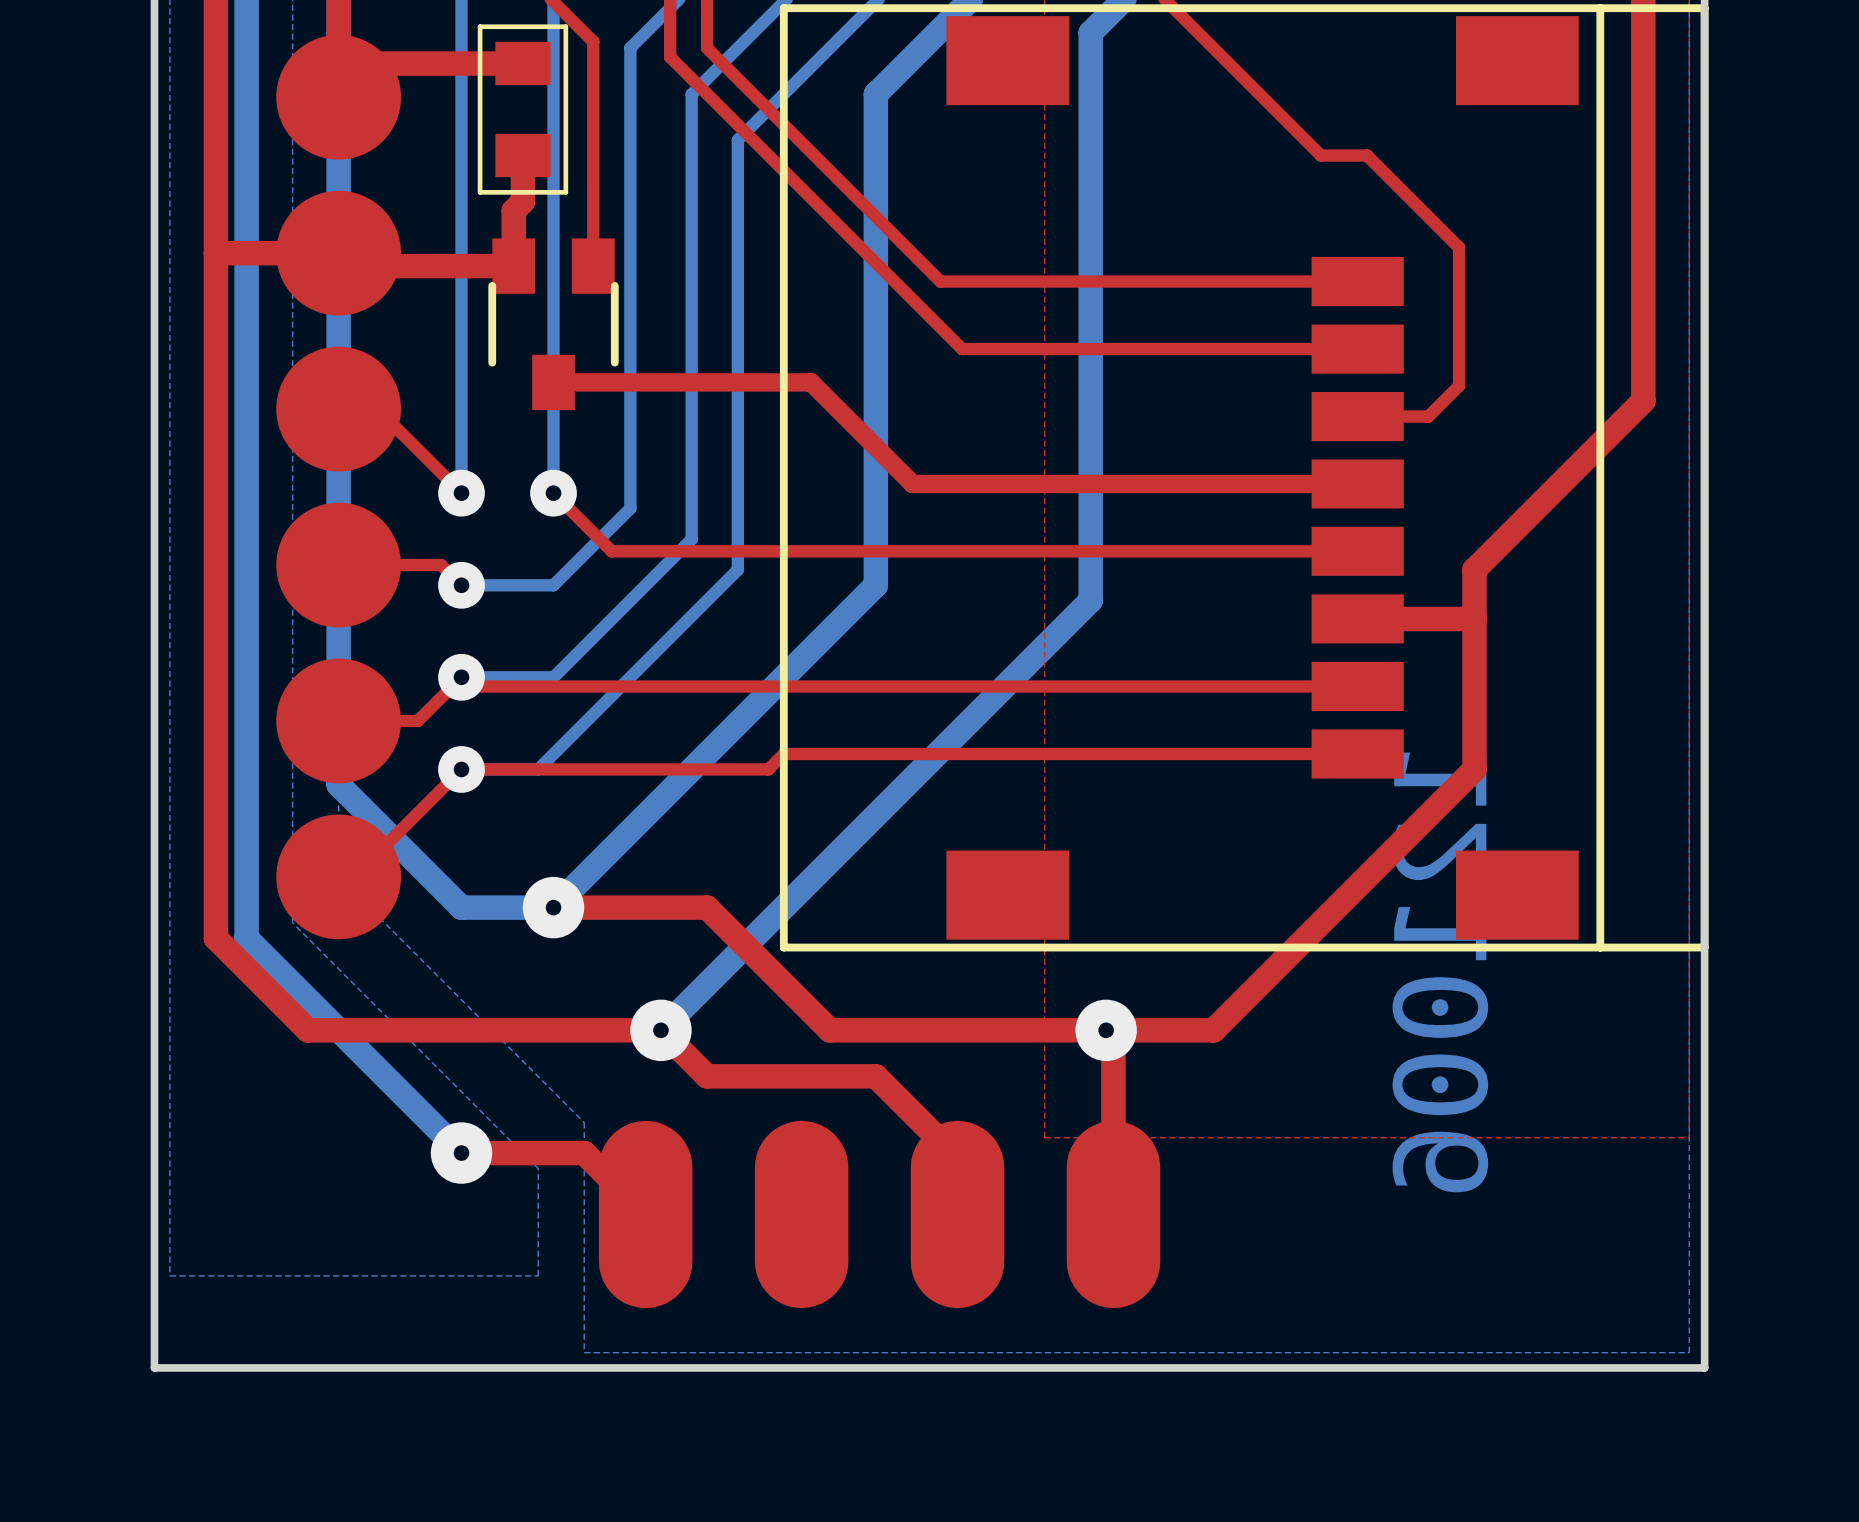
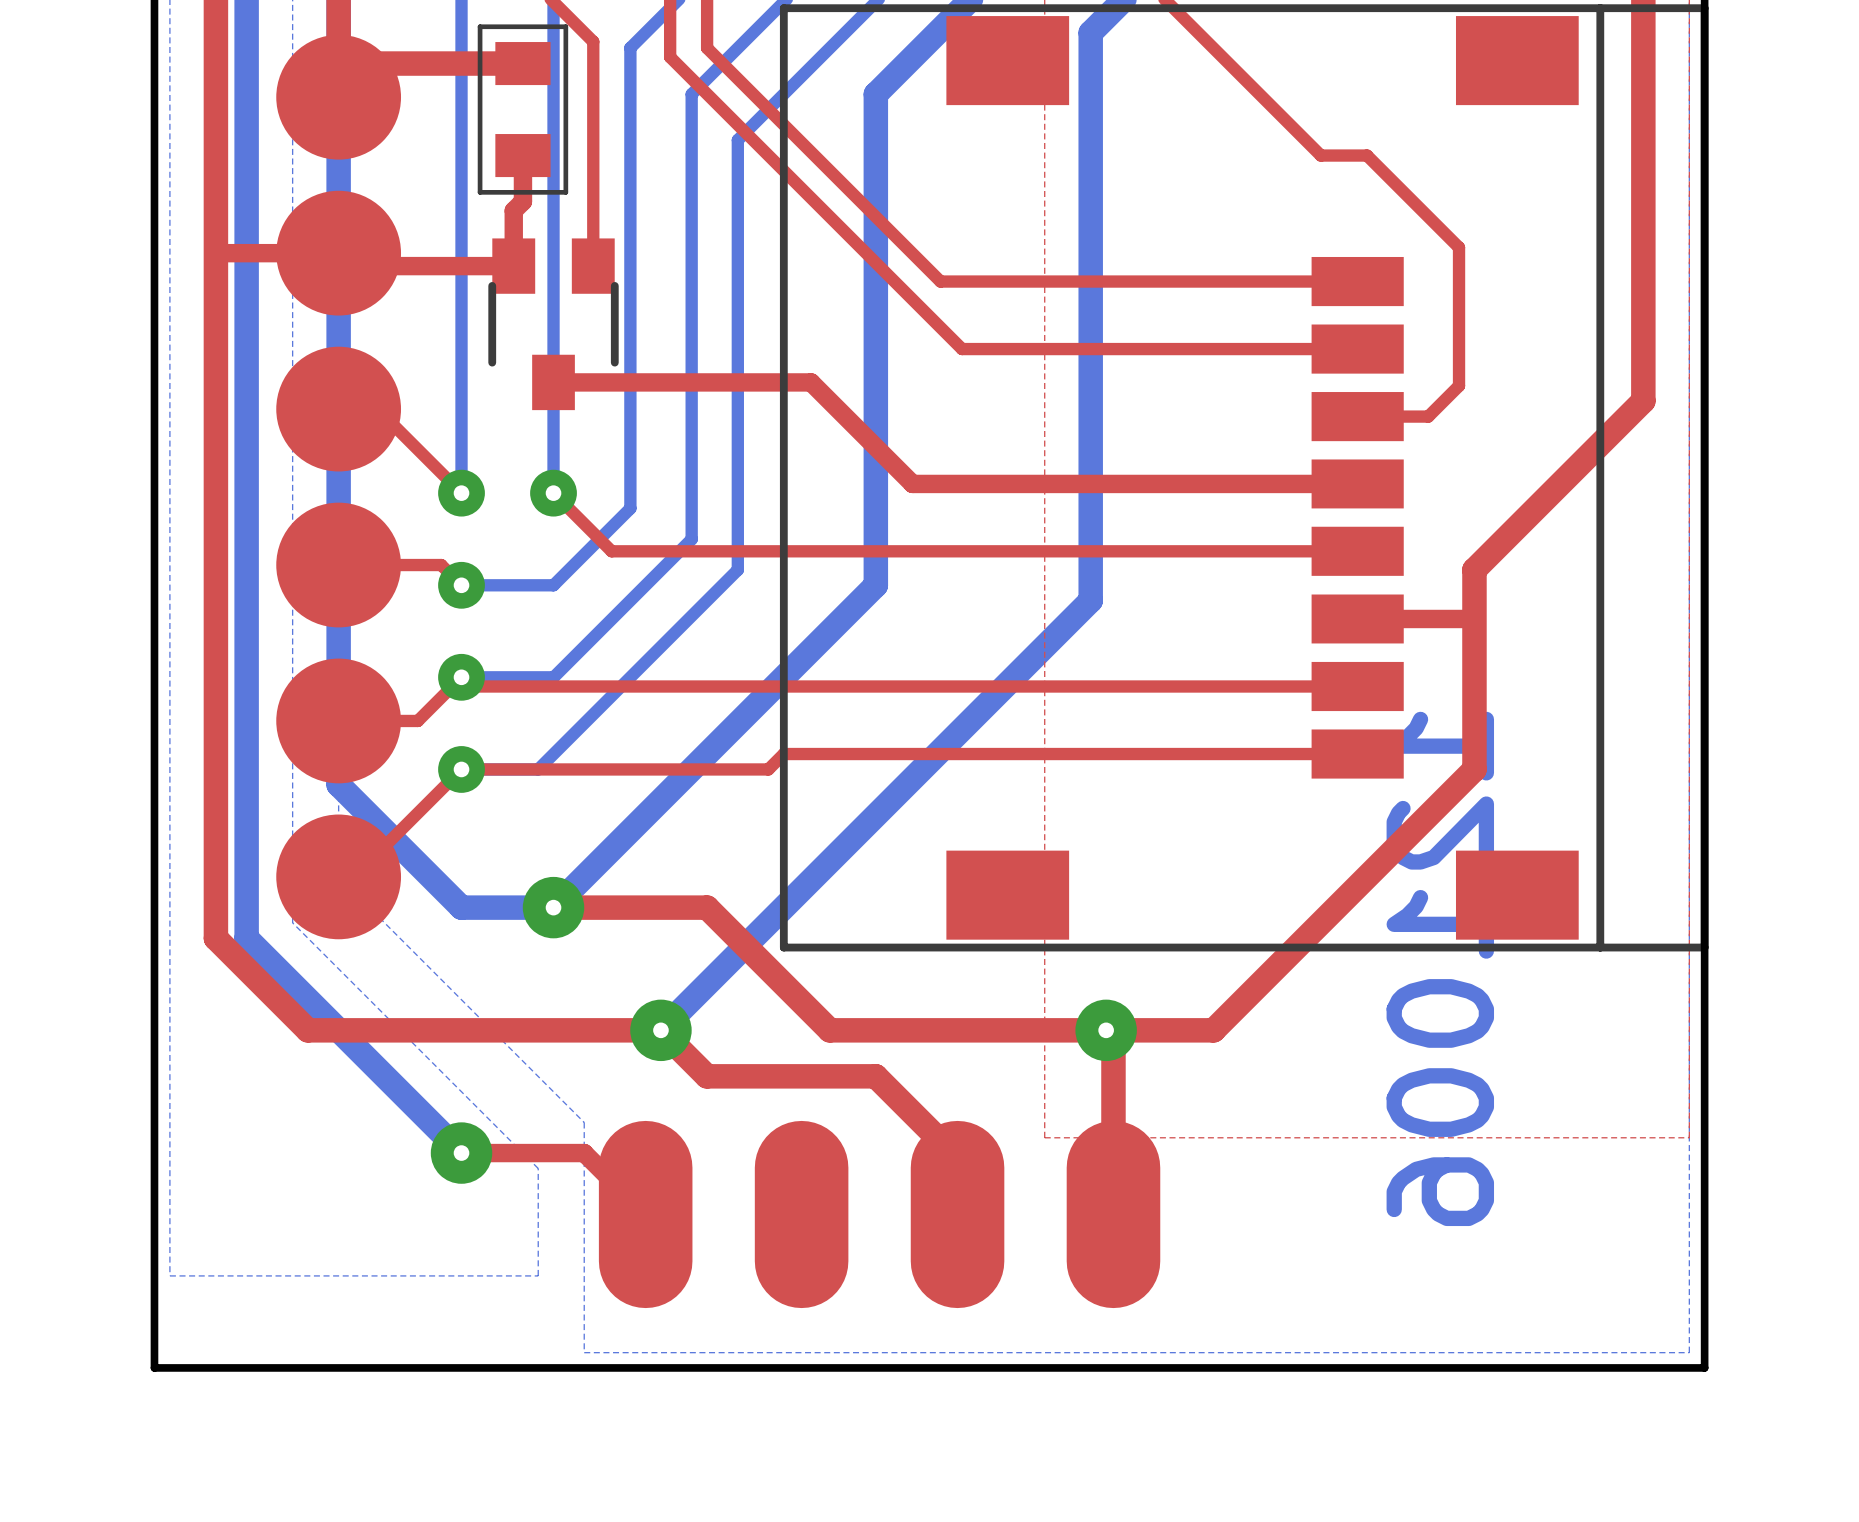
top track width: thick (522, 155) (522, 201) (513, 210) (513, 266) (351, 266) (338, 253) (215, 253) -> thin (522, 155) (522, 201) (513, 210) (513, 266) (351, 266) (338, 253) (215, 253)
top track width: thick (1357, 618) (1474, 618) -> thin (1357, 618) (1474, 618)
top track width: thick (461, 1153) (584, 1153) (645, 1214) -> thin (461, 1153) (584, 1153) (645, 1214)

